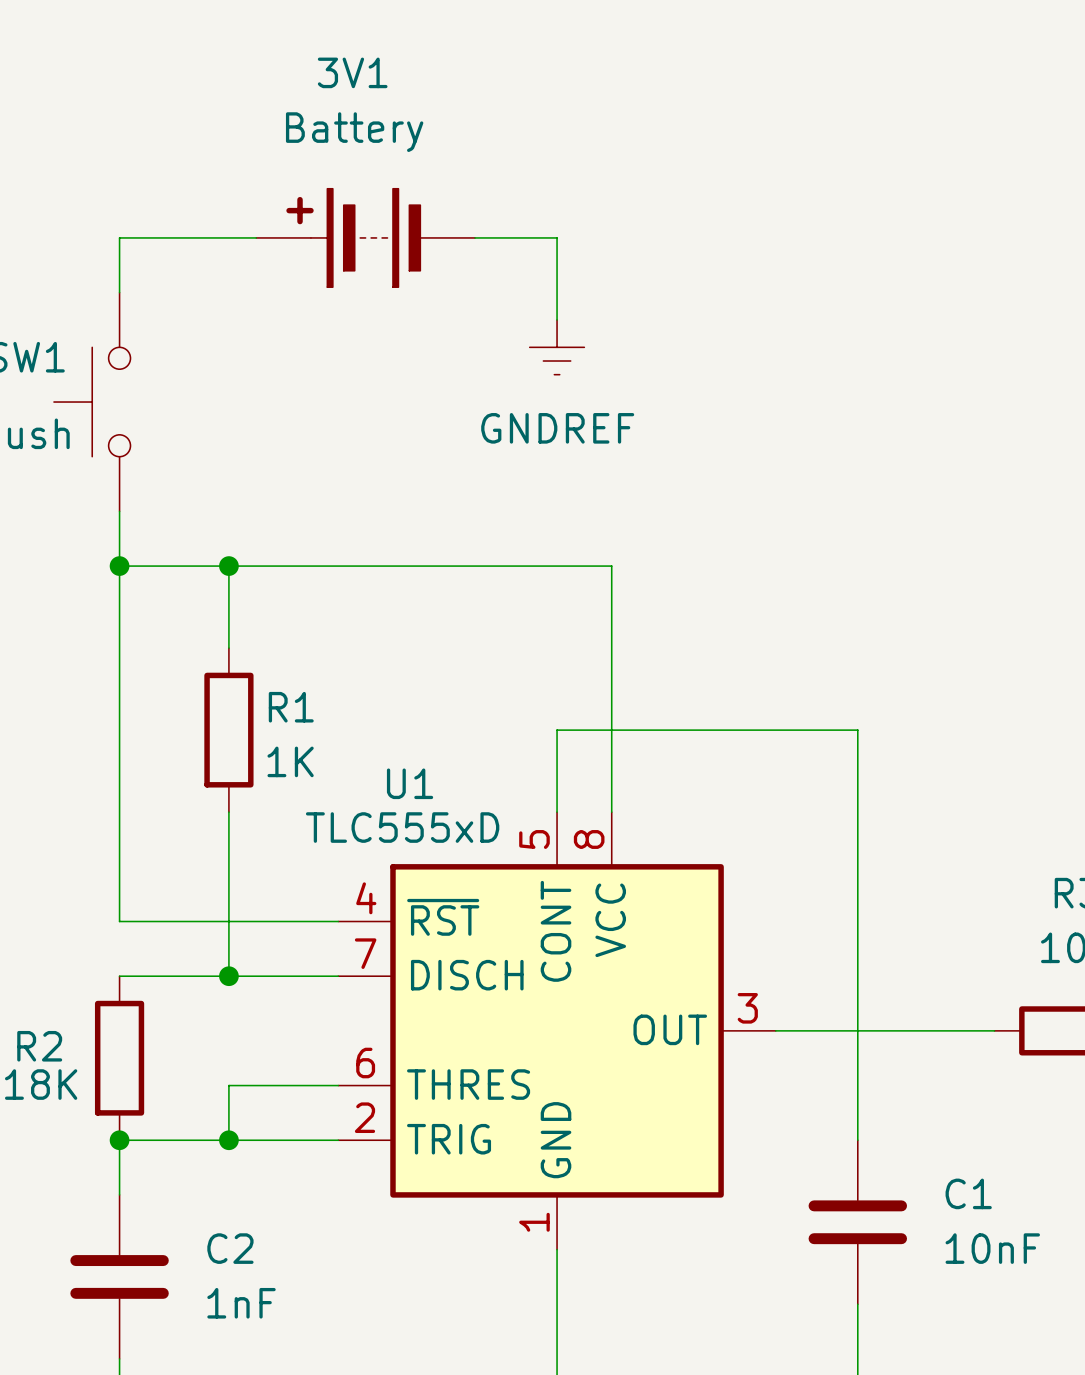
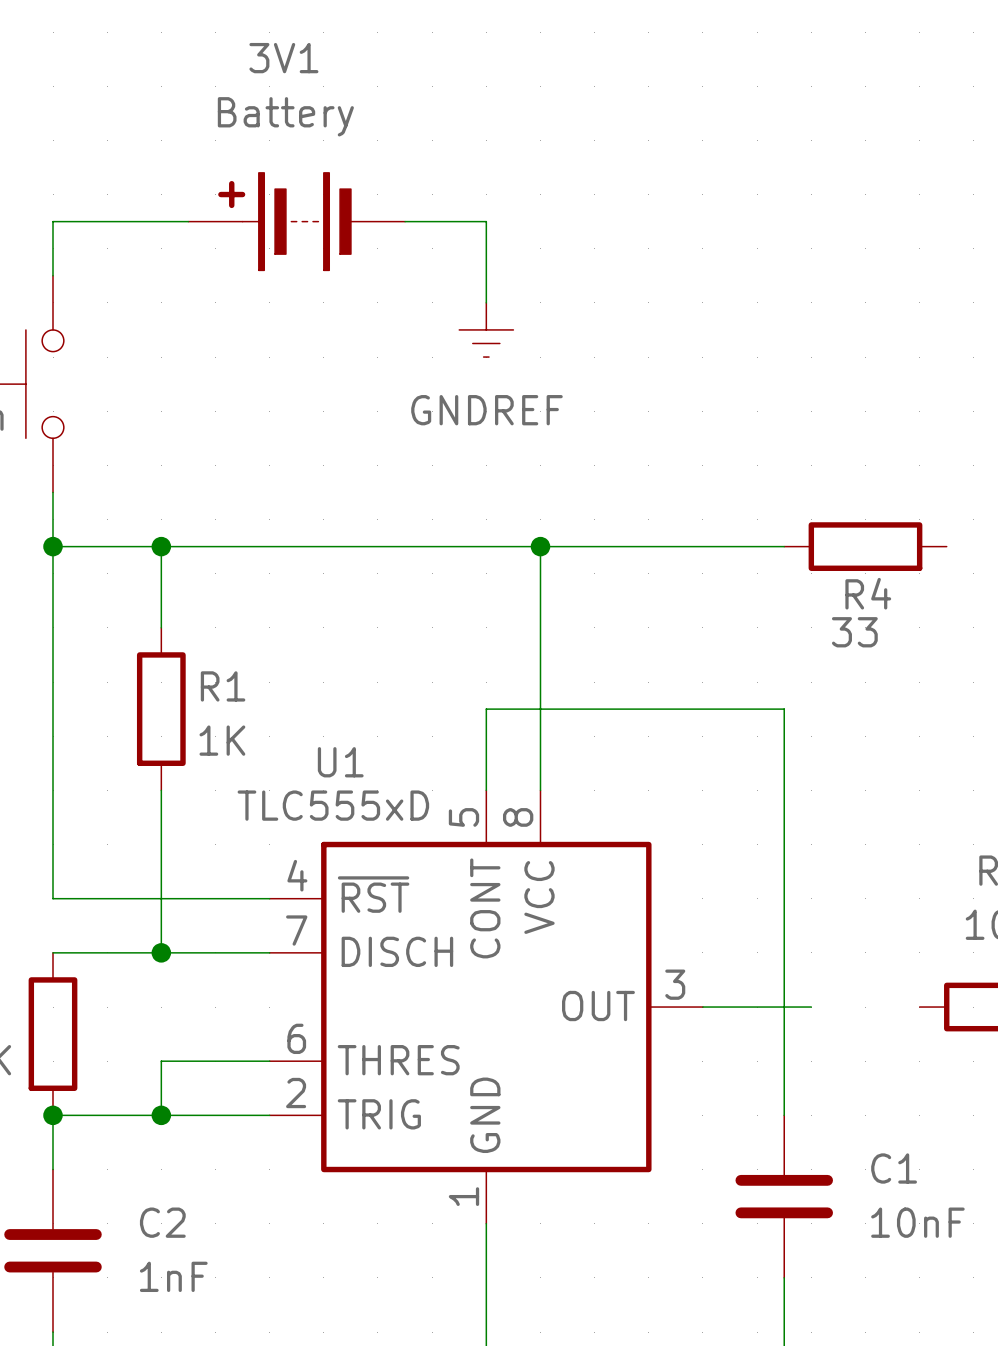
wire: none -> (540, 546) (784, 546)
junction: none -> (540, 546)
R4: none -> 33 (865, 546)
wire: (885, 1030) (994, 1030) -> none

